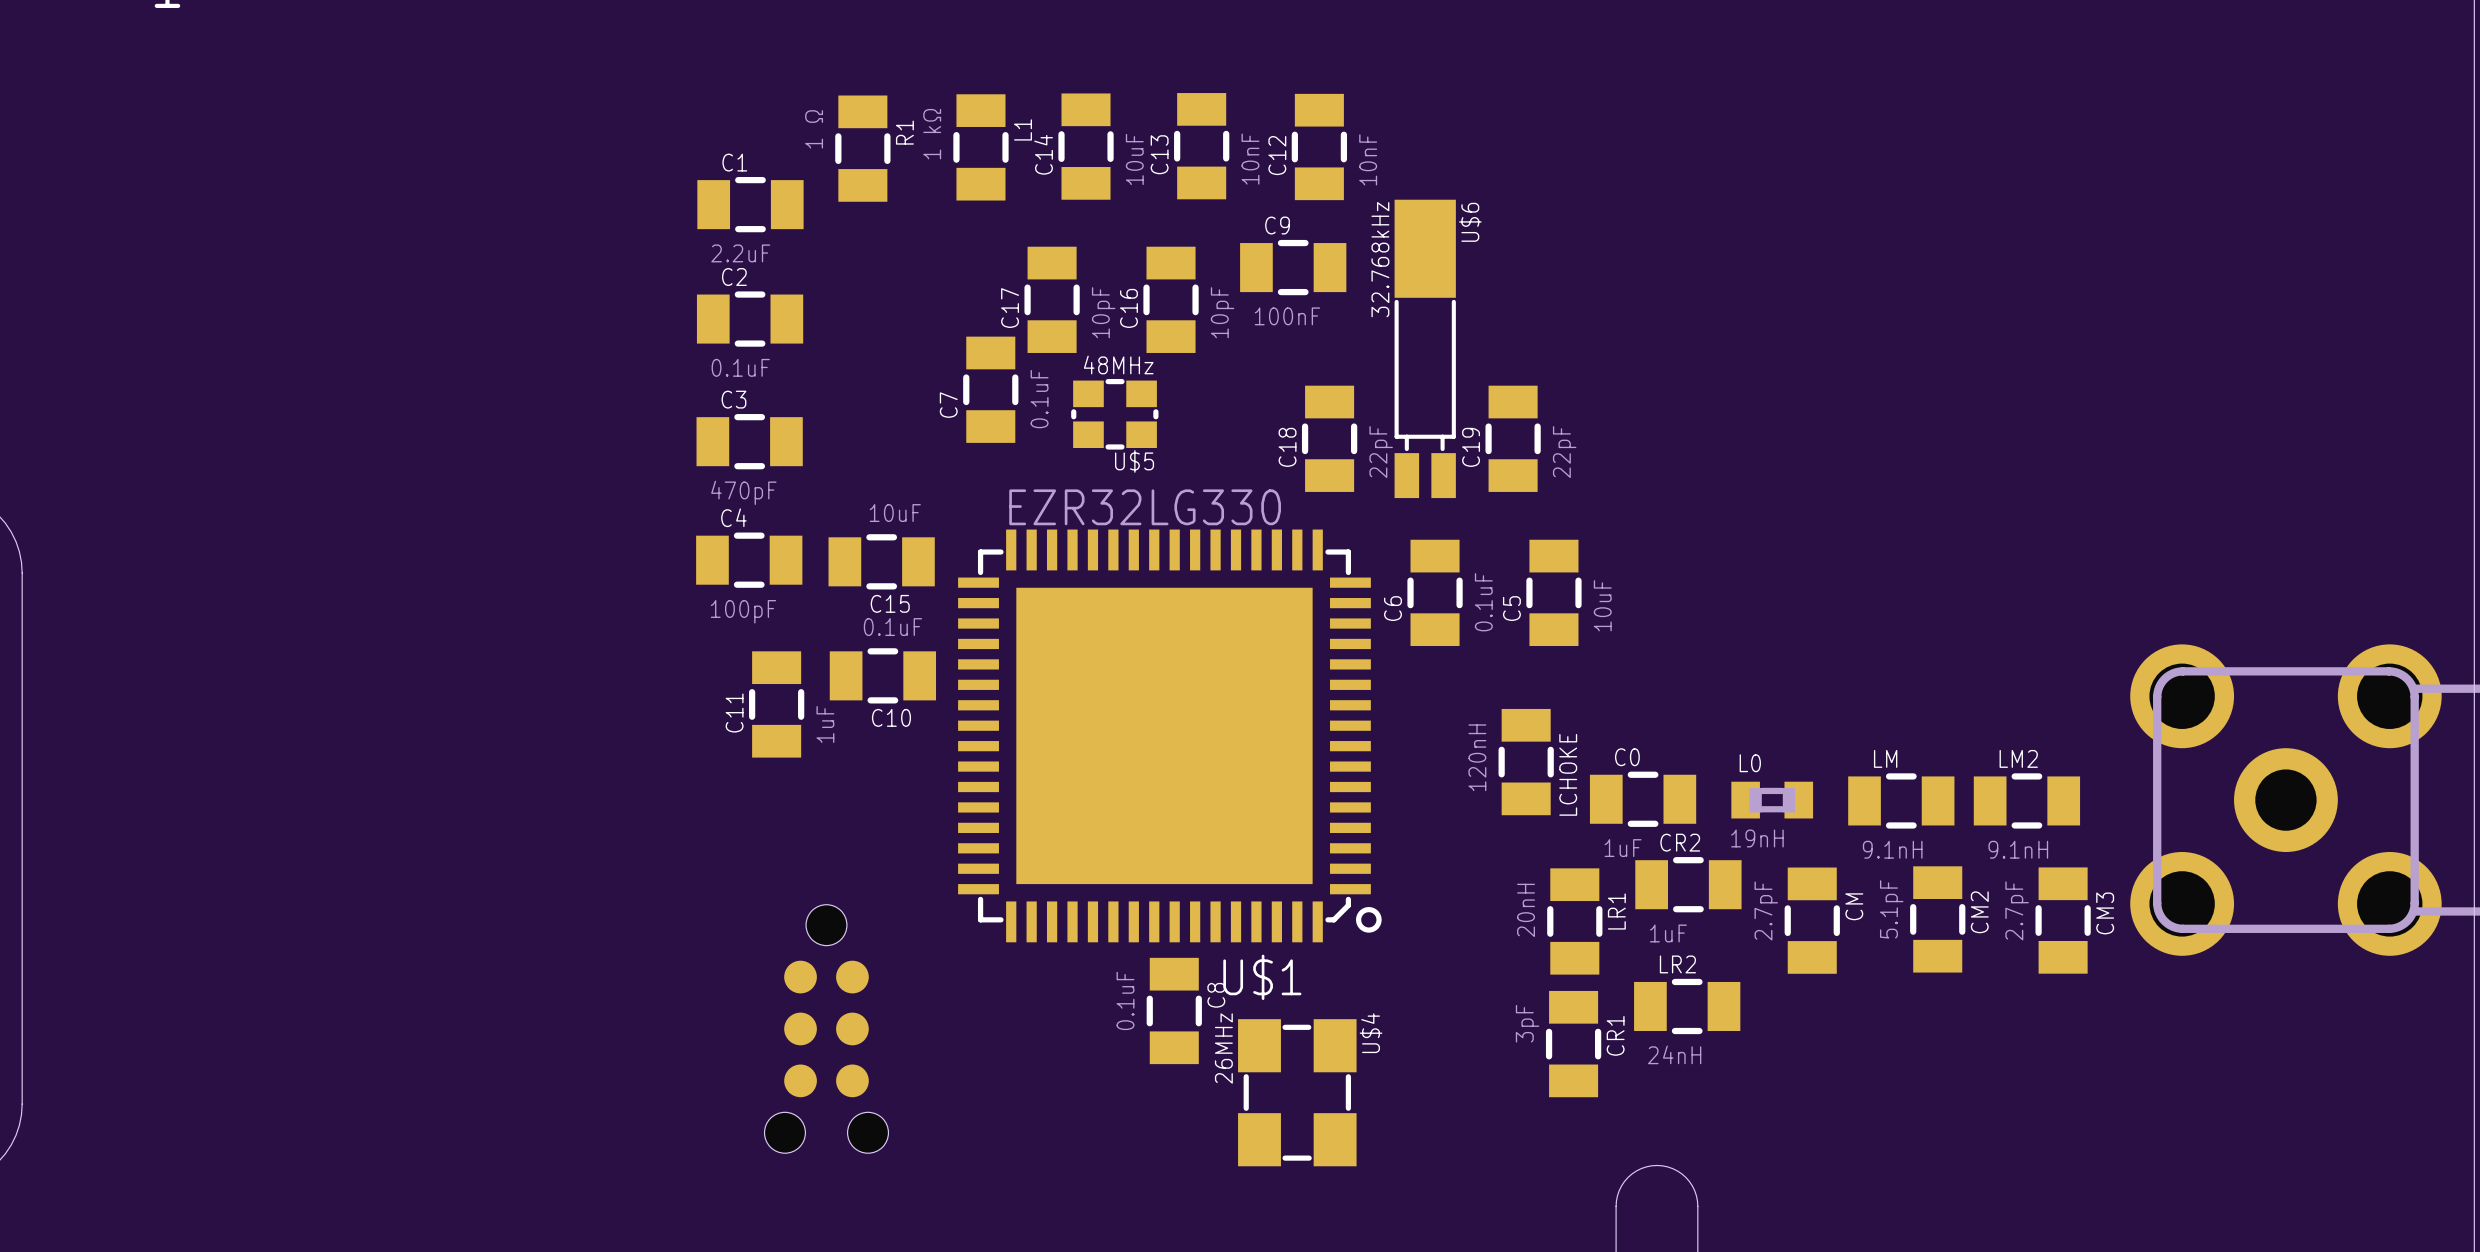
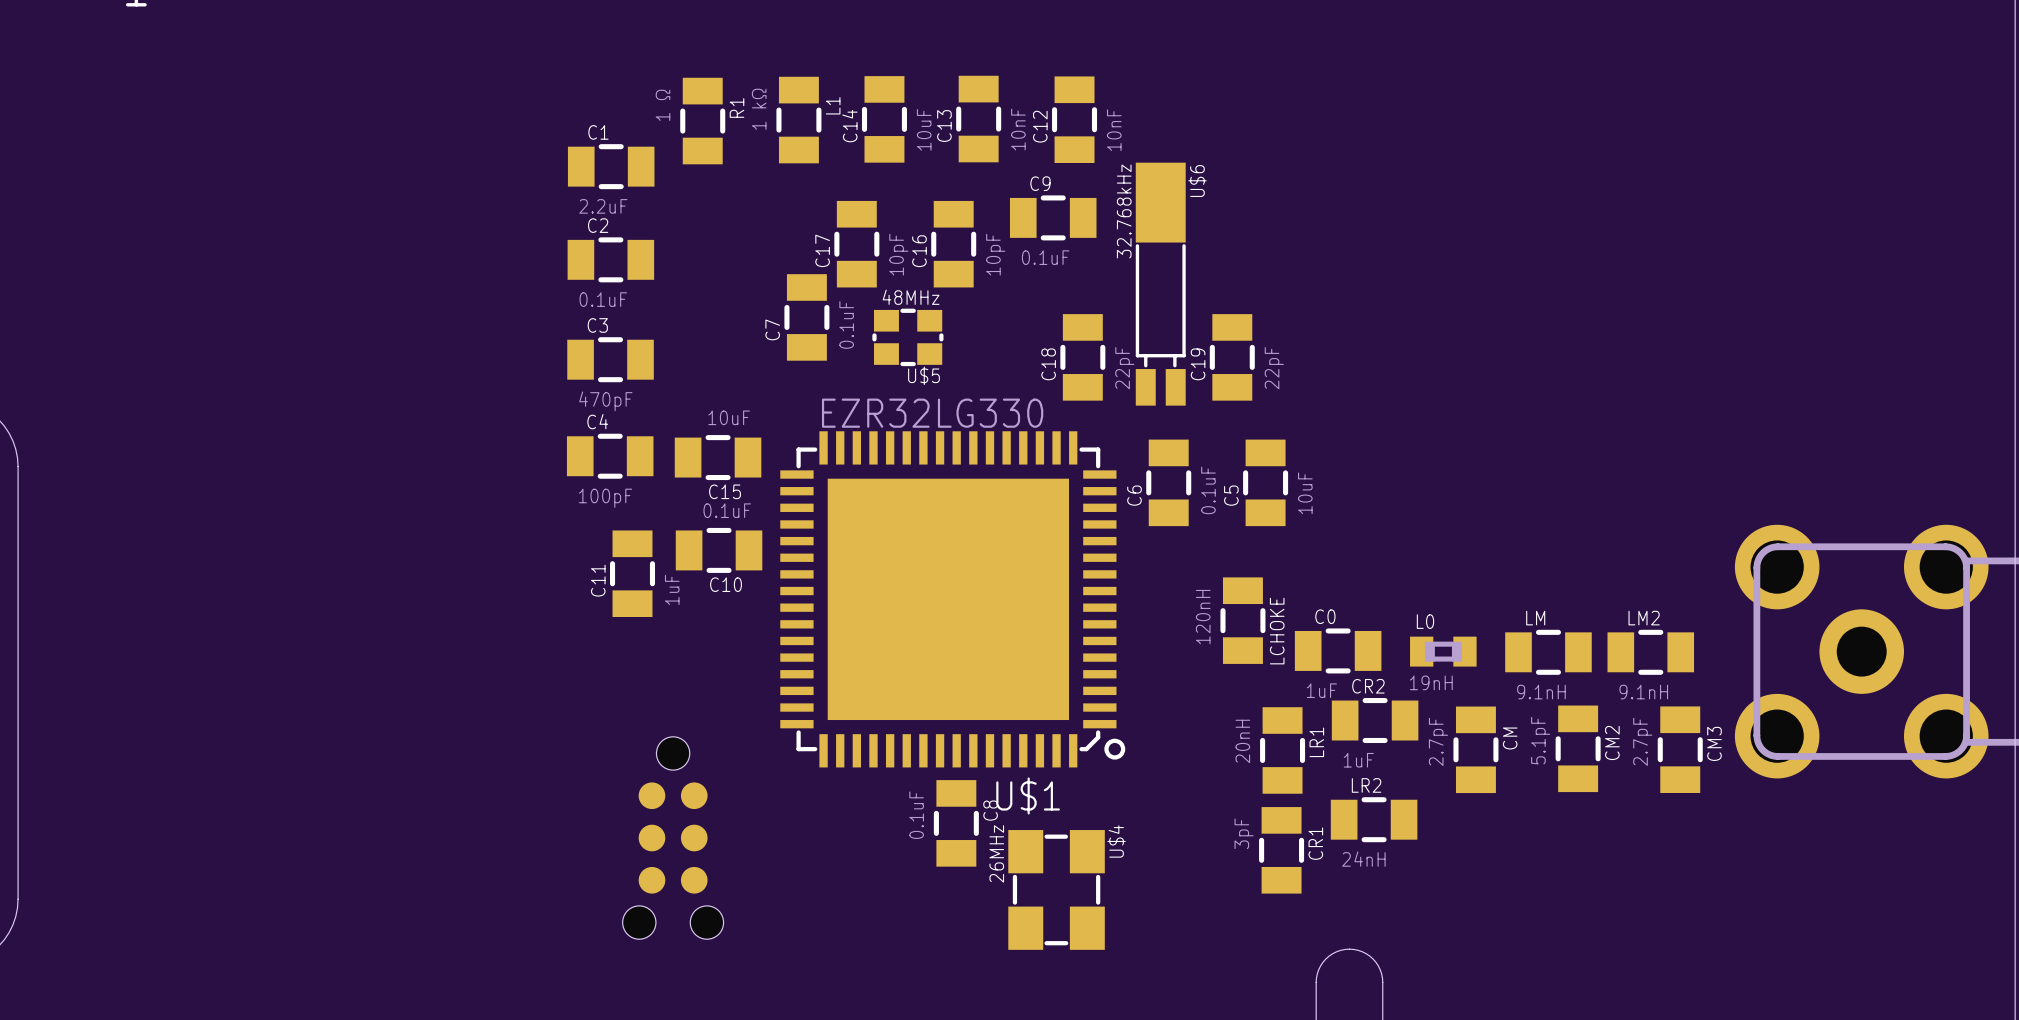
C9 value: 100nF (1287, 316) -> 0.1uF (1045, 257)

